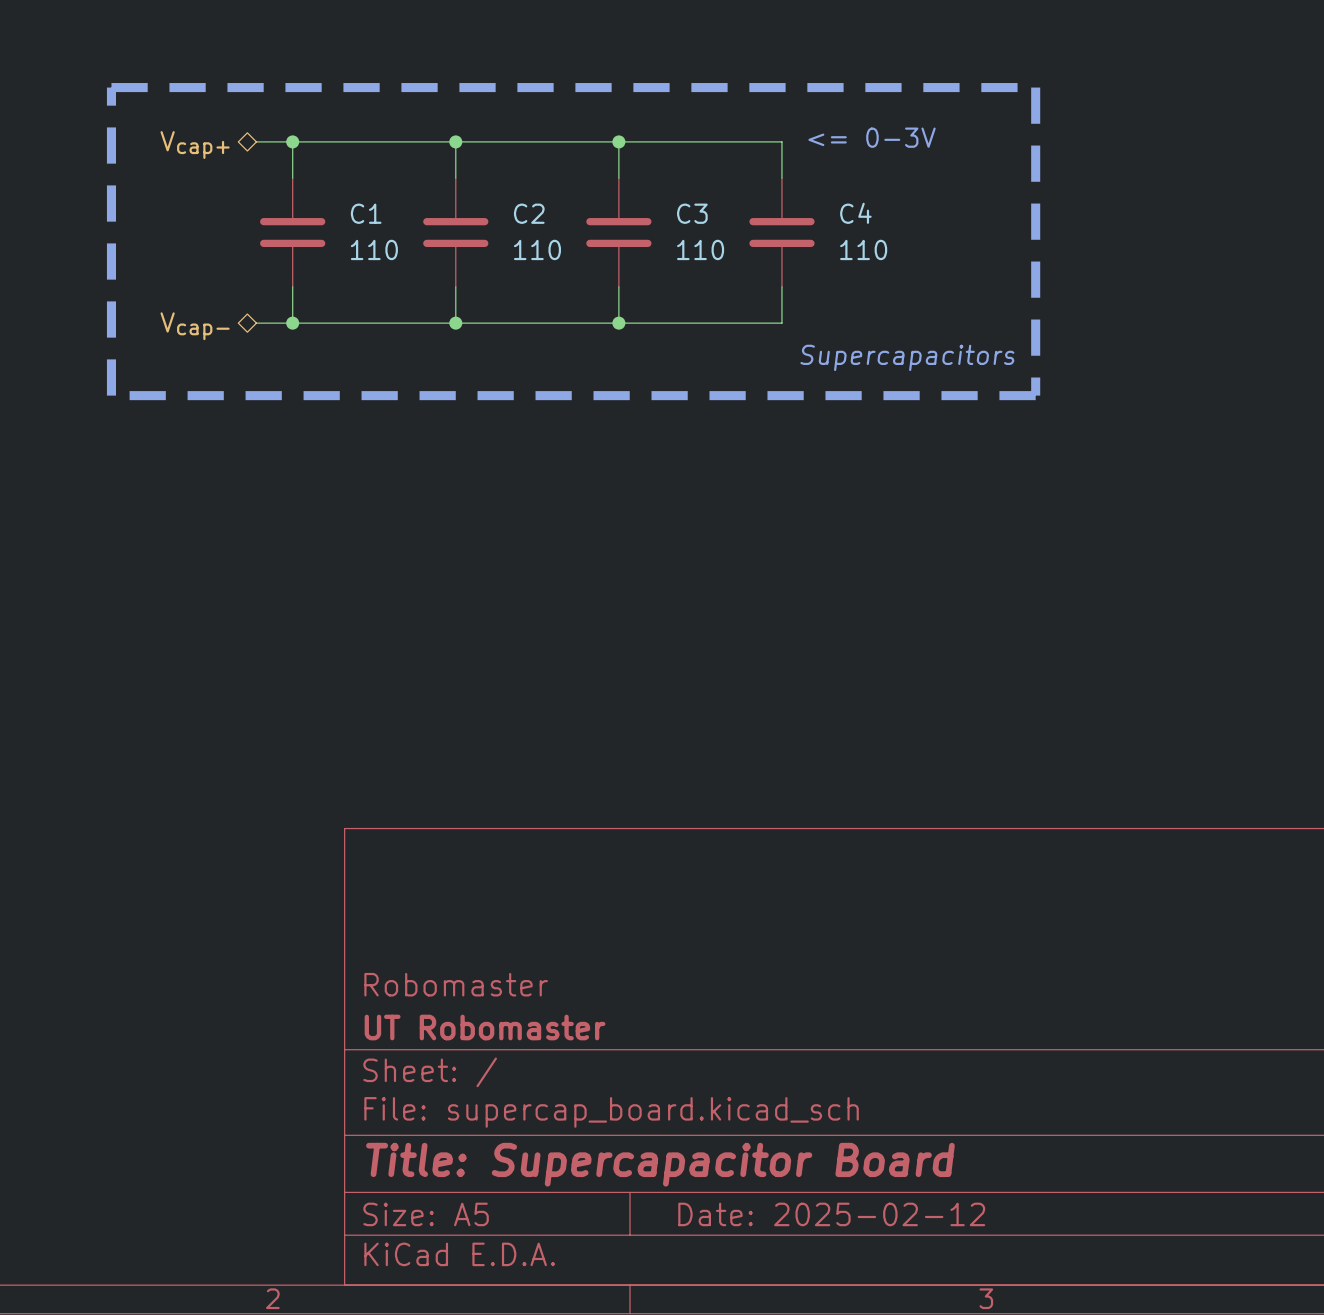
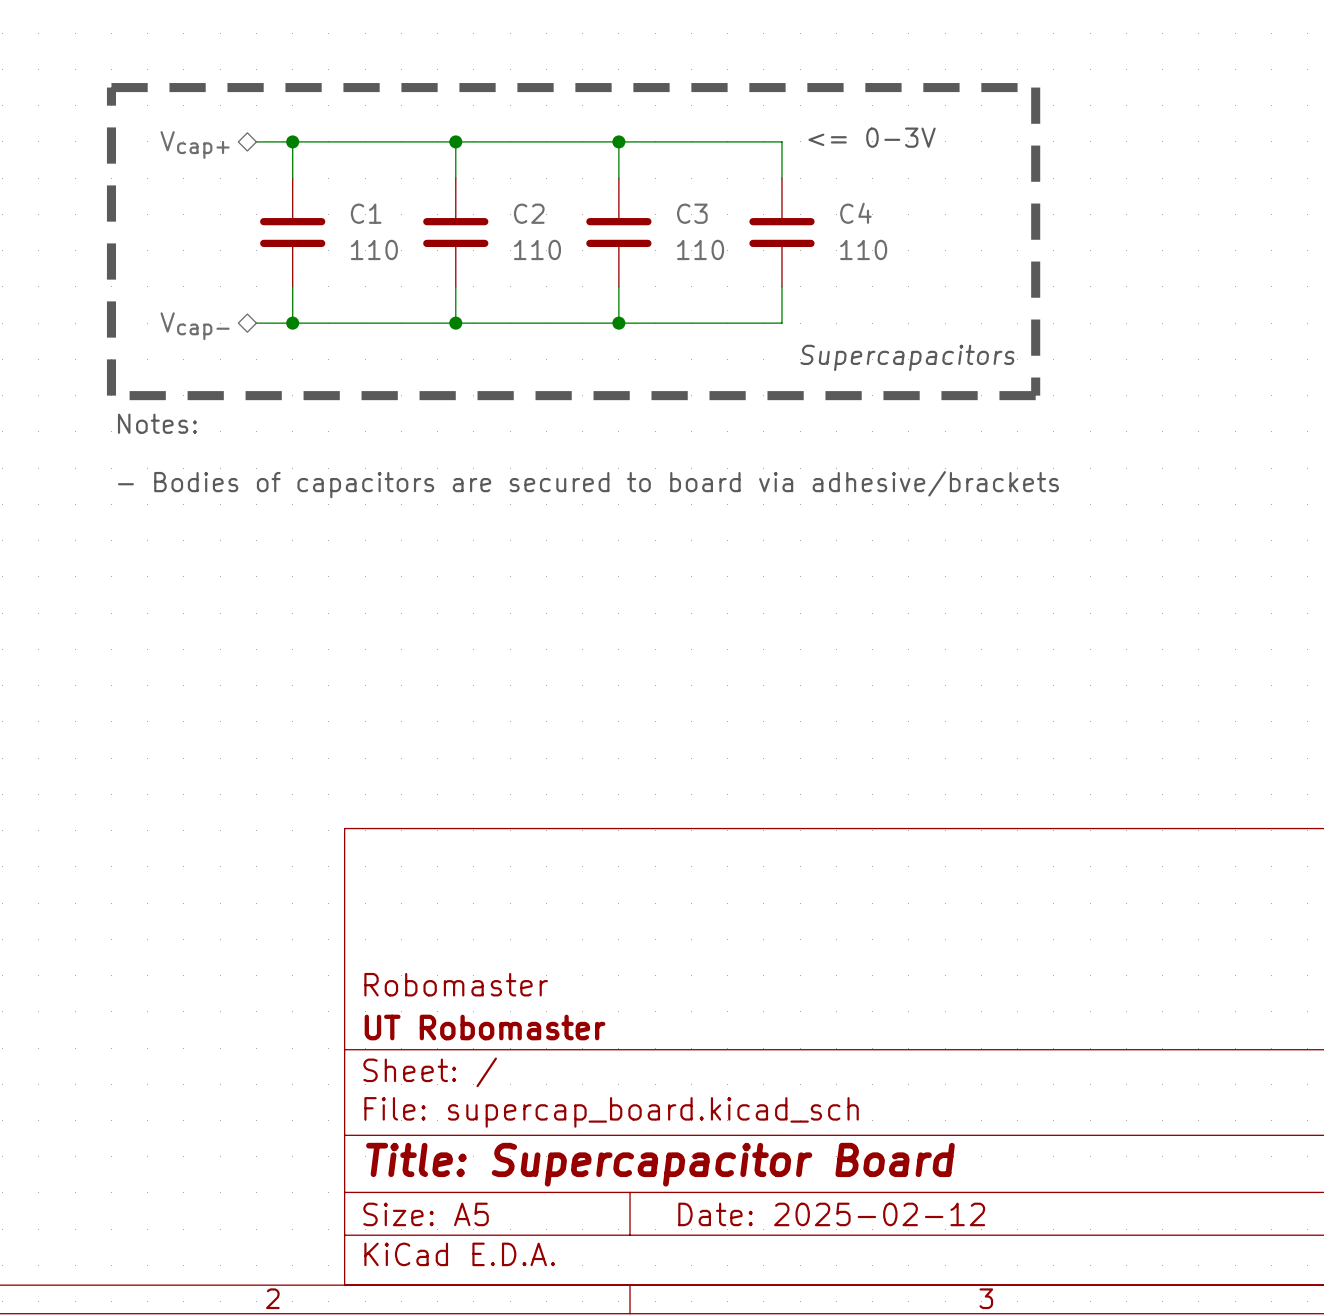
text: none -> Notes: (157, 423)
text: none -> - Bodies of capacitors are secured to board via adhesive/brackets (588, 484)

